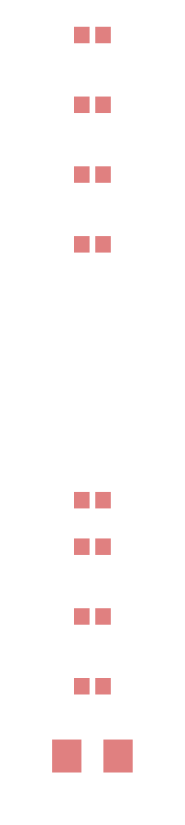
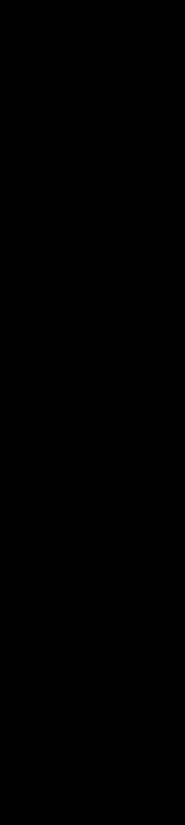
part: (92, 35) -> none
part: (92, 104) -> none
part: (92, 174) -> none
part: (92, 244) -> none
part: (92, 500) -> none
part: (92, 546) -> none
part: (92, 616) -> none
part: (92, 686) -> none
part: (92, 756) -> none

